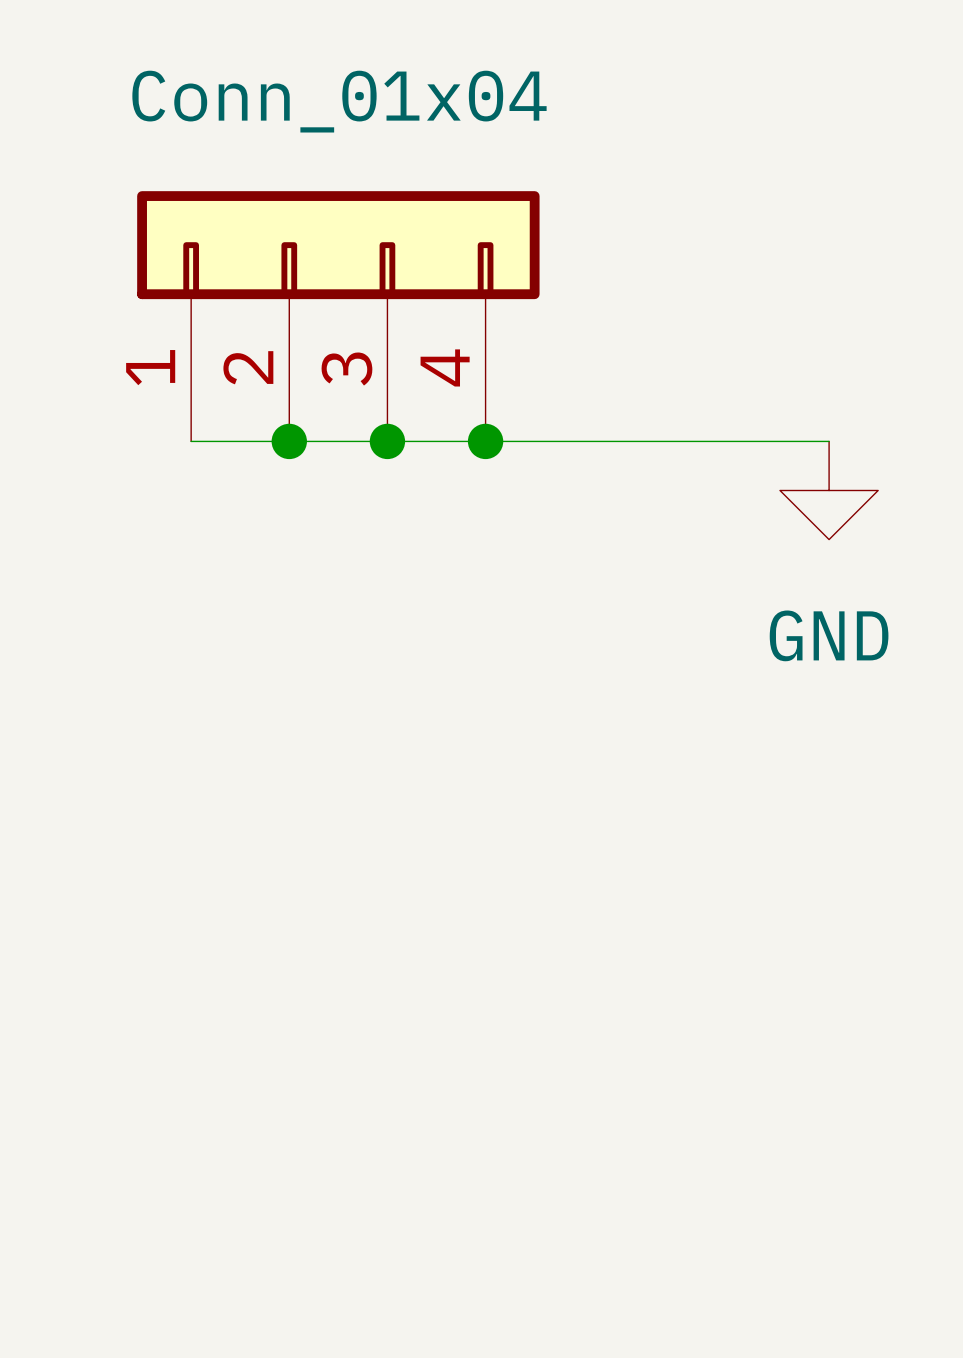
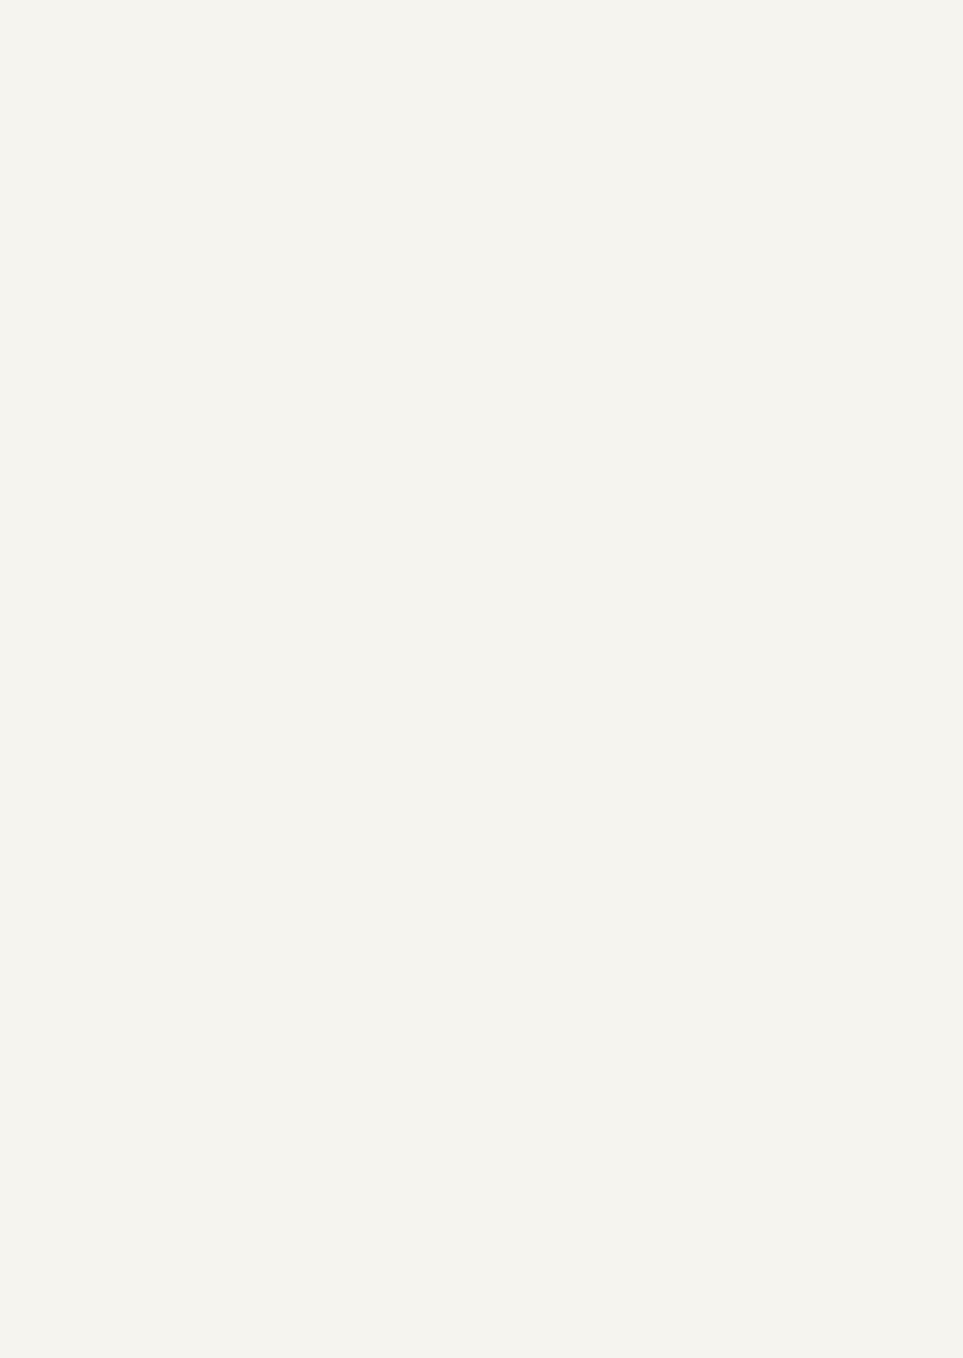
part: Conn_01x04 (338, 316) -> none
wire: (191, 441) (829, 441) -> none
junction: (289, 441) -> none
junction: (387, 441) -> none
junction: (485, 441) -> none
power symbol: GND (829, 490) -> none

